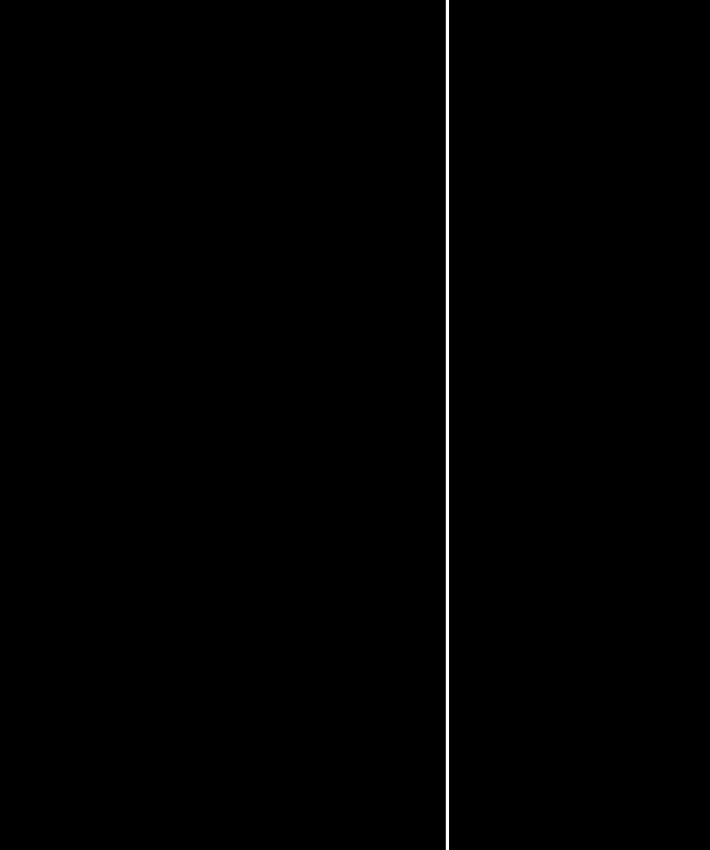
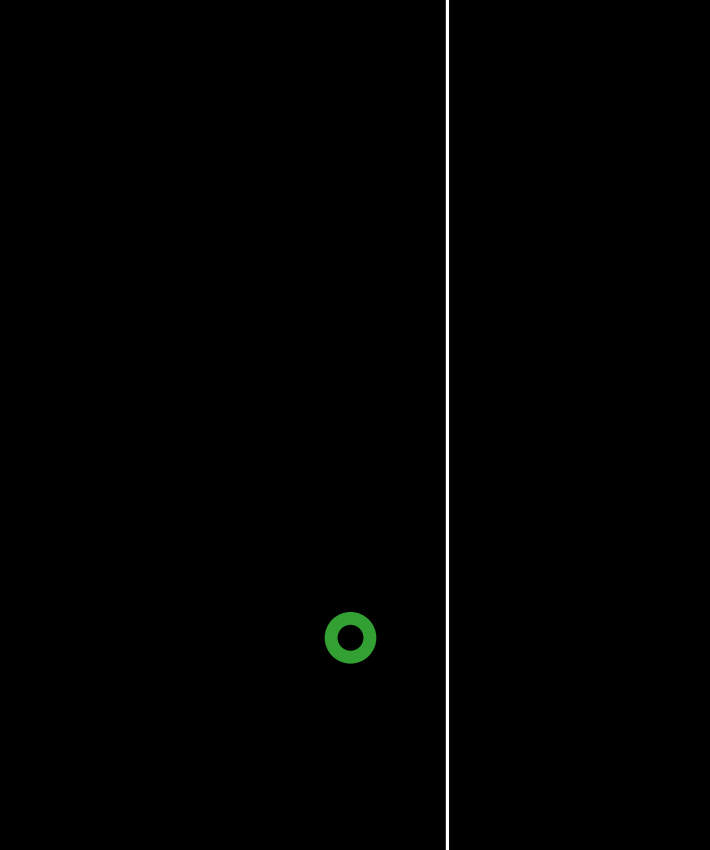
via: none -> (350, 637)

